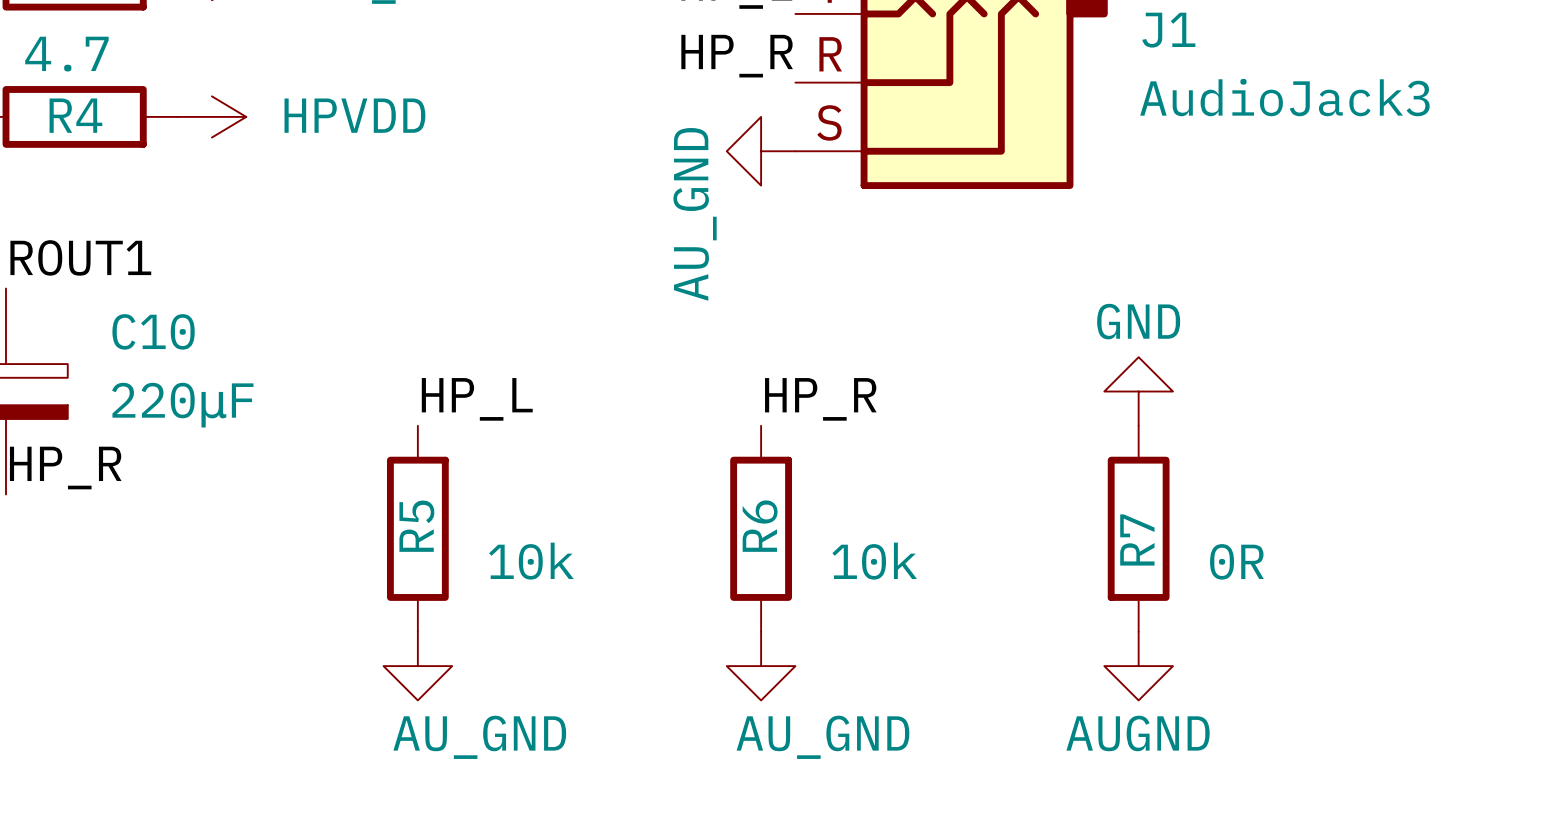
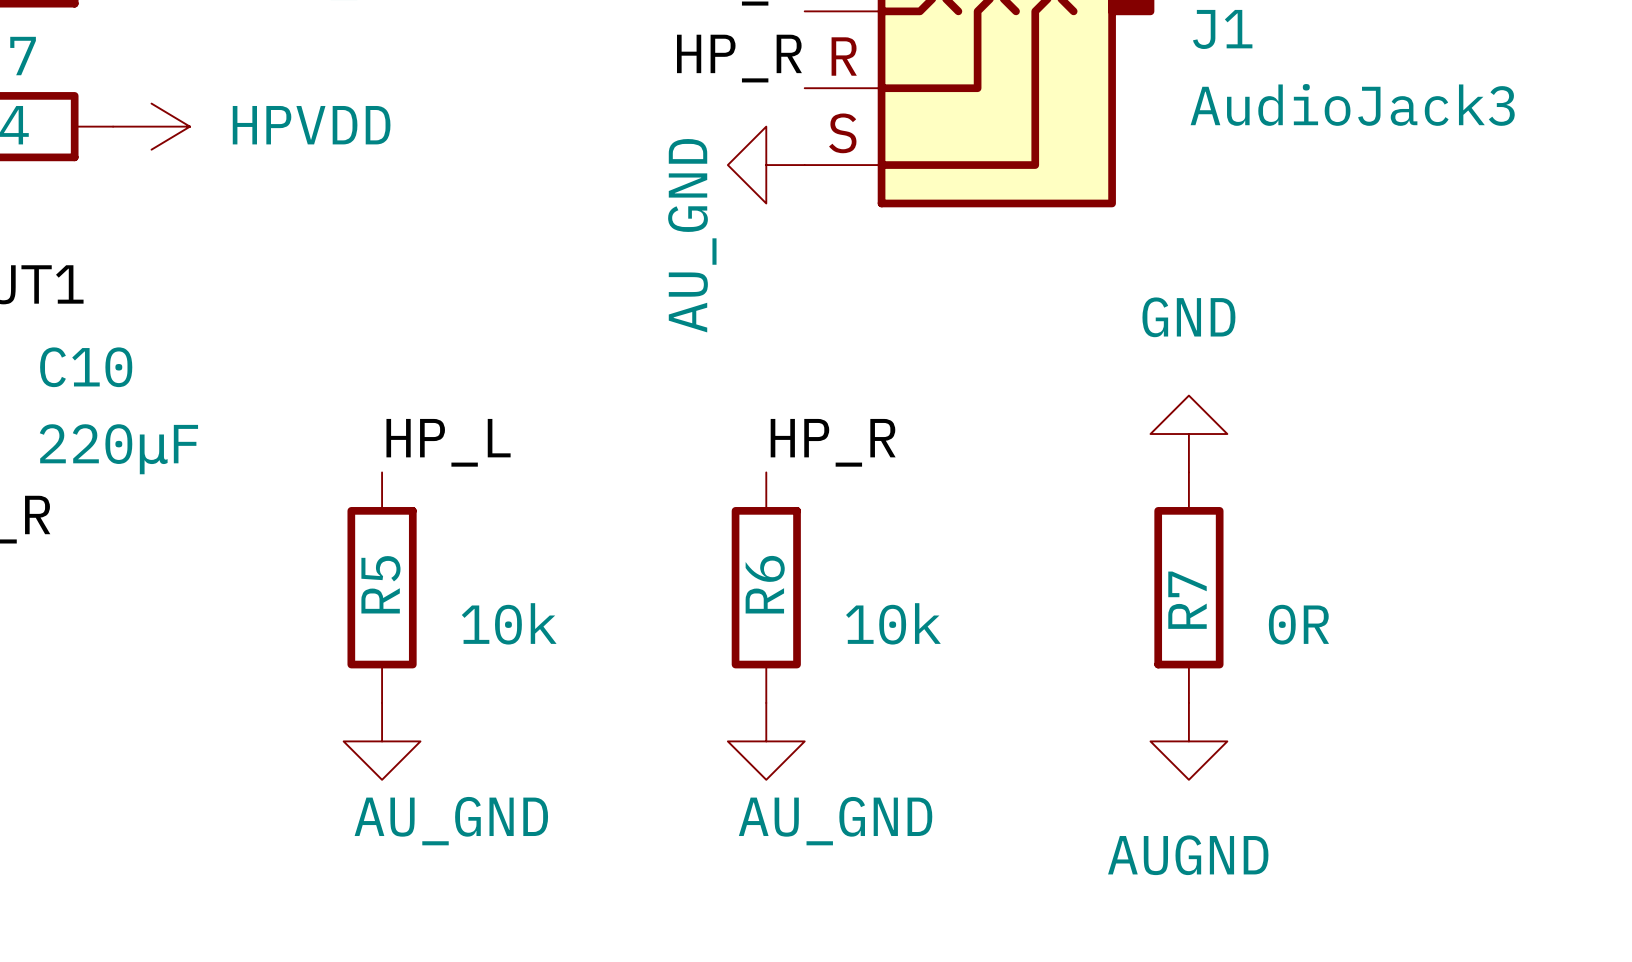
power symbol text position: GND (1138, 321) -> GND (1188, 317)
power symbol text position: AUGND (1138, 733) -> AUGND (1188, 855)

